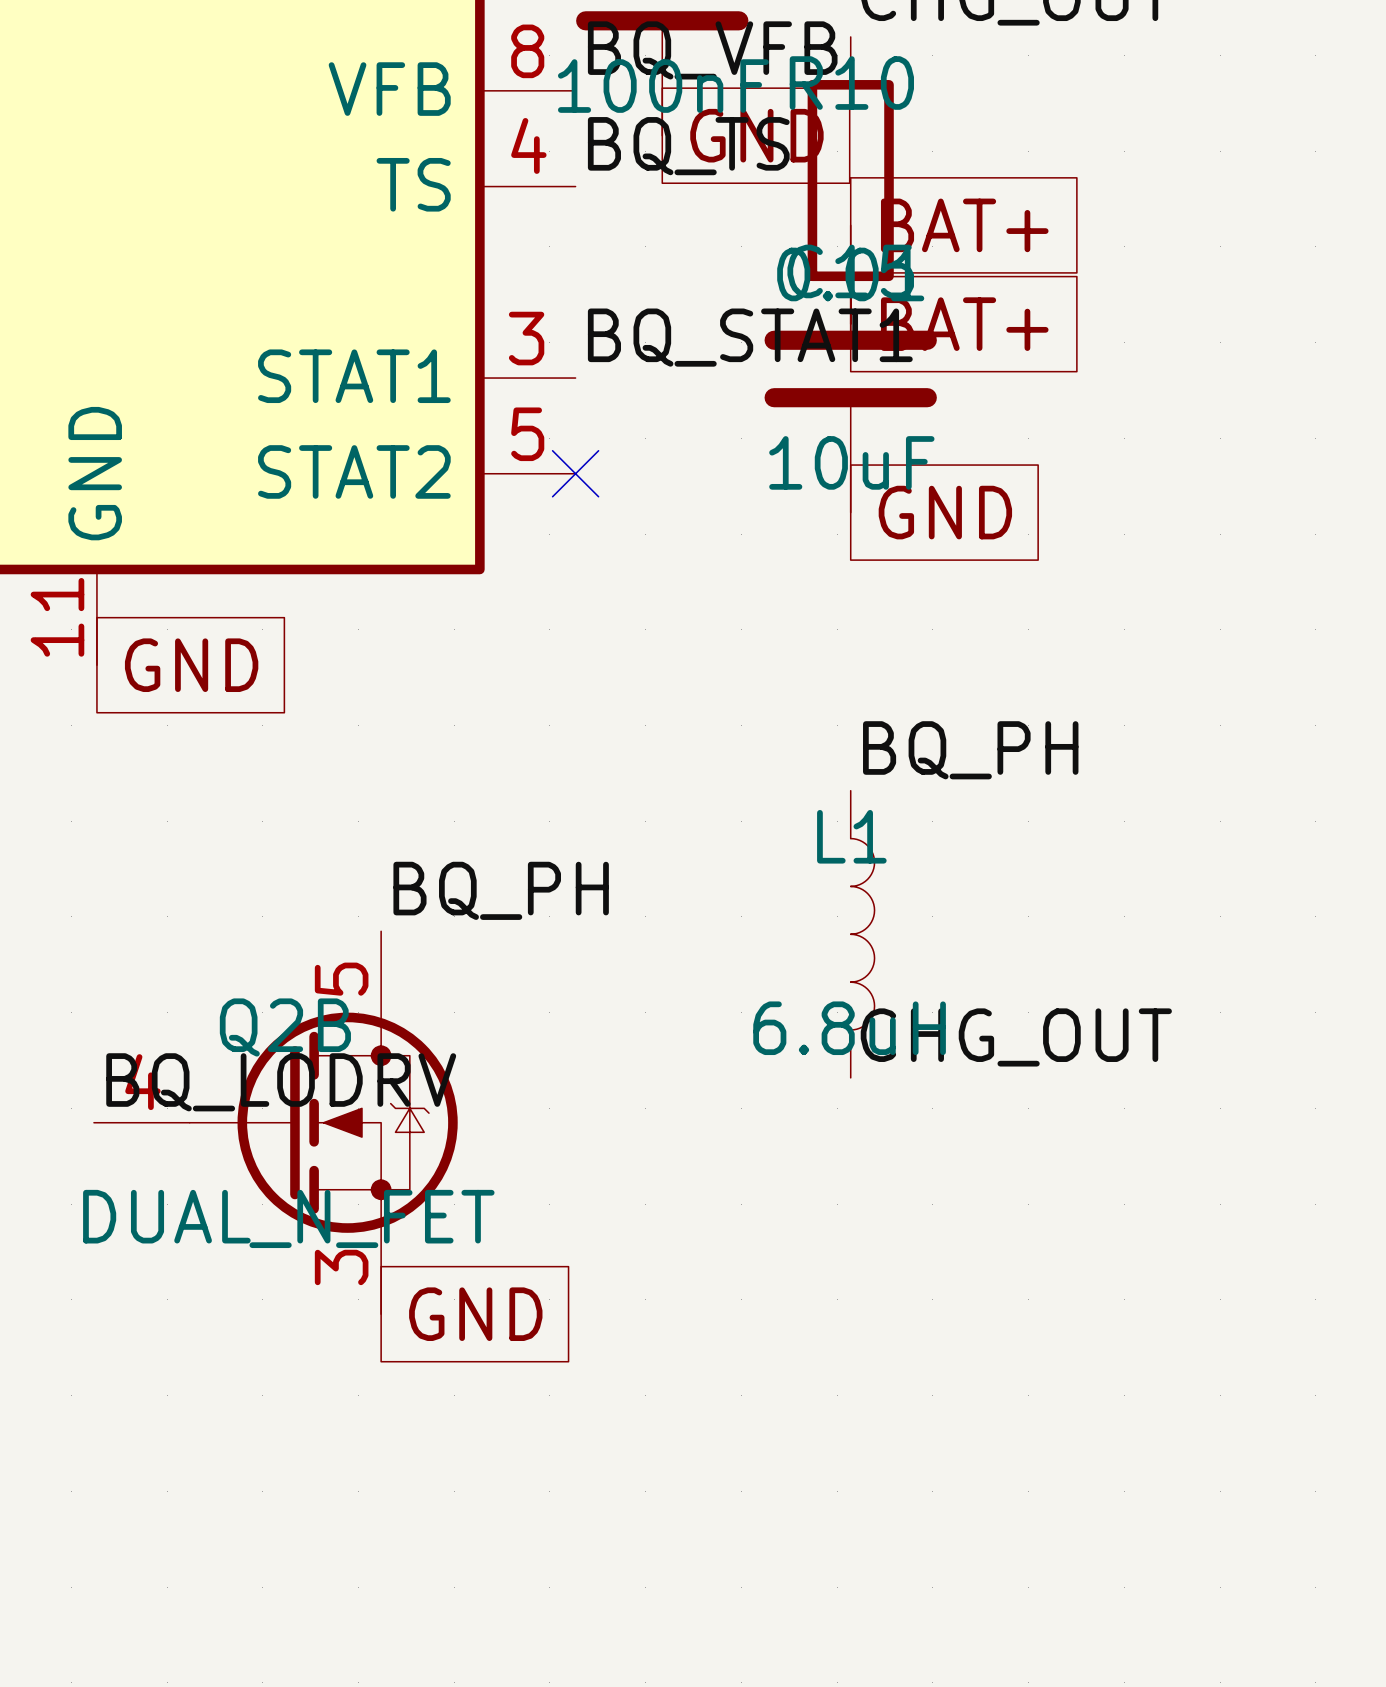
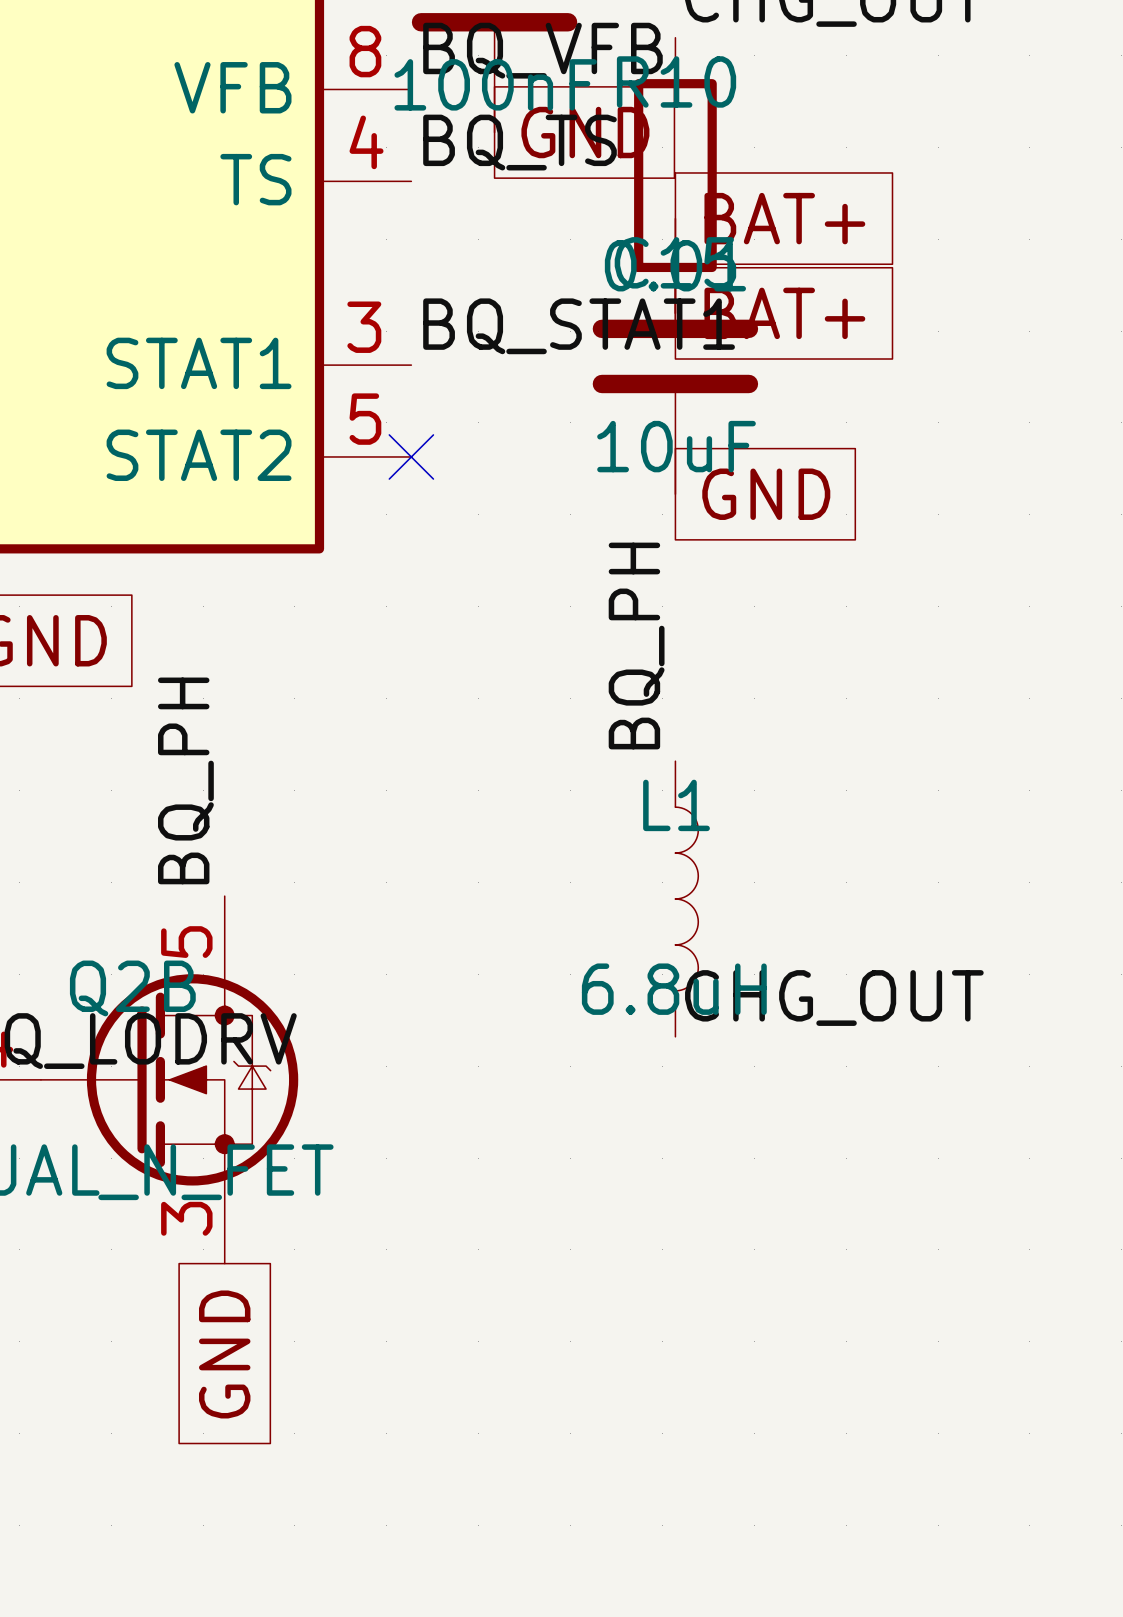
label rotation: 0° (970, 750) -> 90° counterclockwise (636, 646)
label rotation: 0° (501, 890) -> 90° counterclockwise (185, 780)
global label rotation: 0° (475, 1314) -> 90° clockwise (224, 1354)

